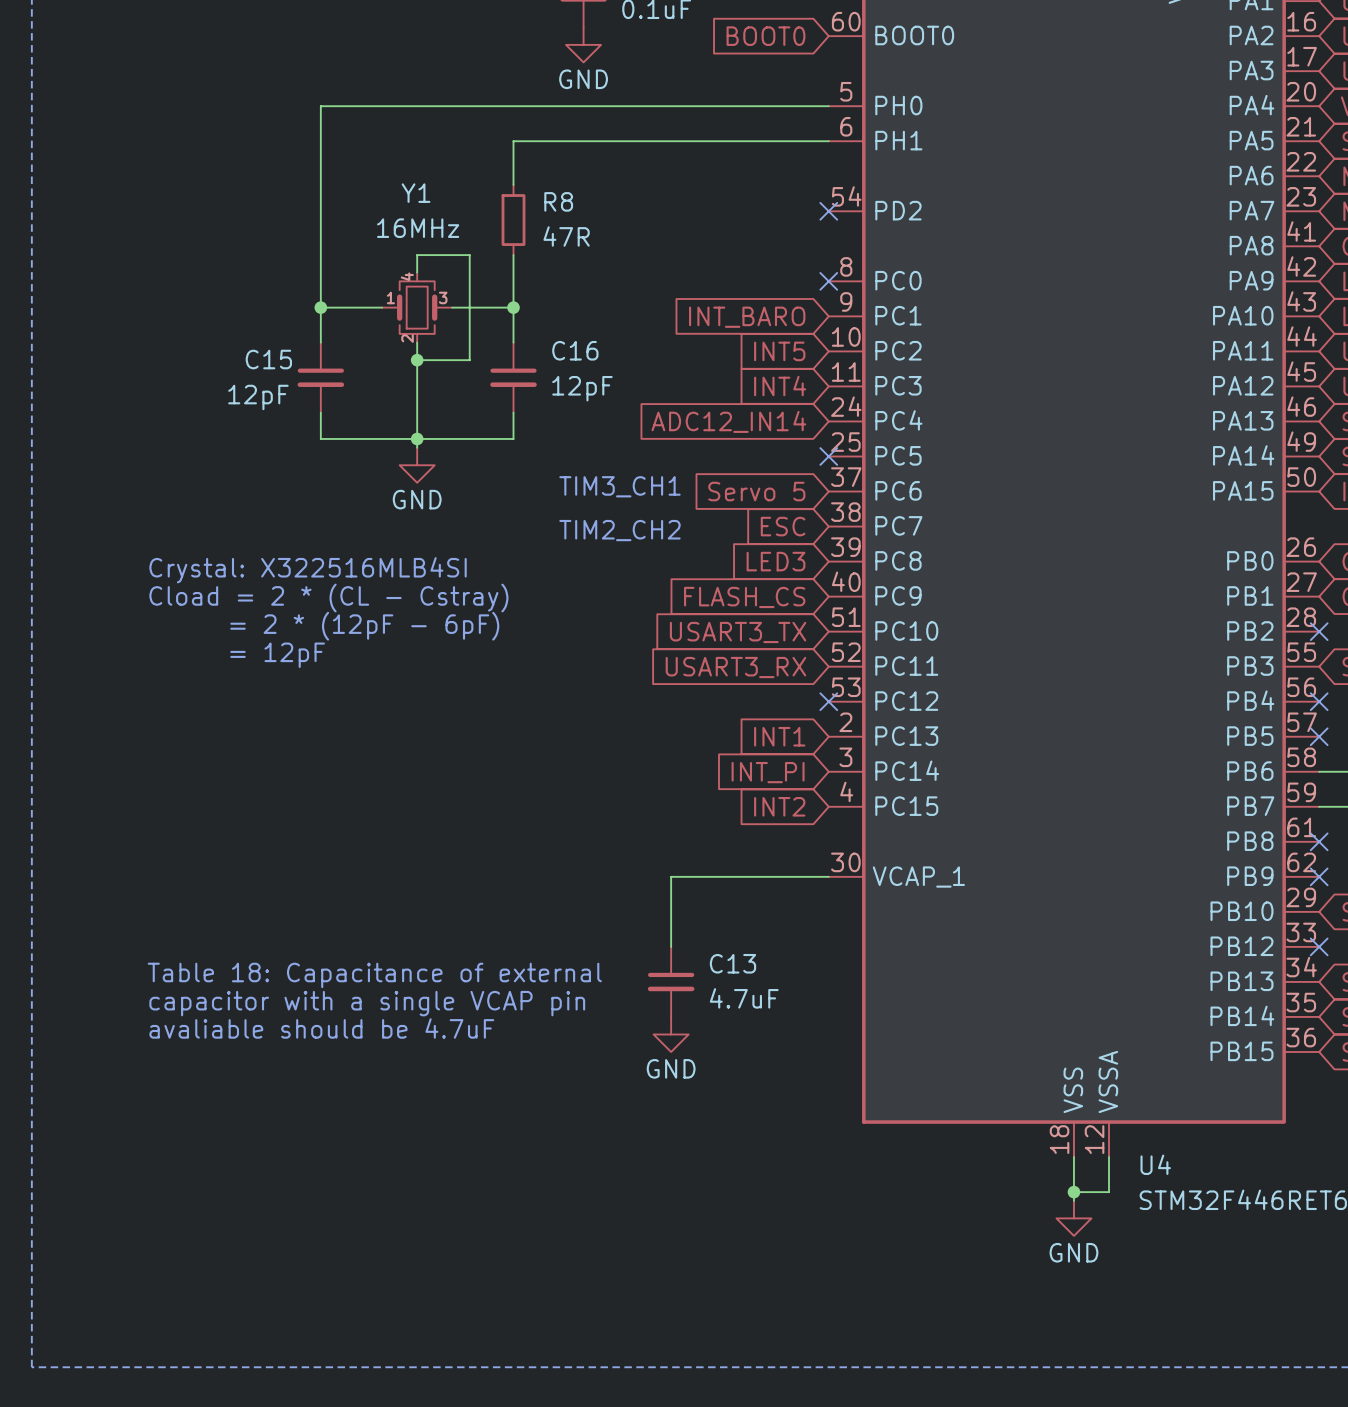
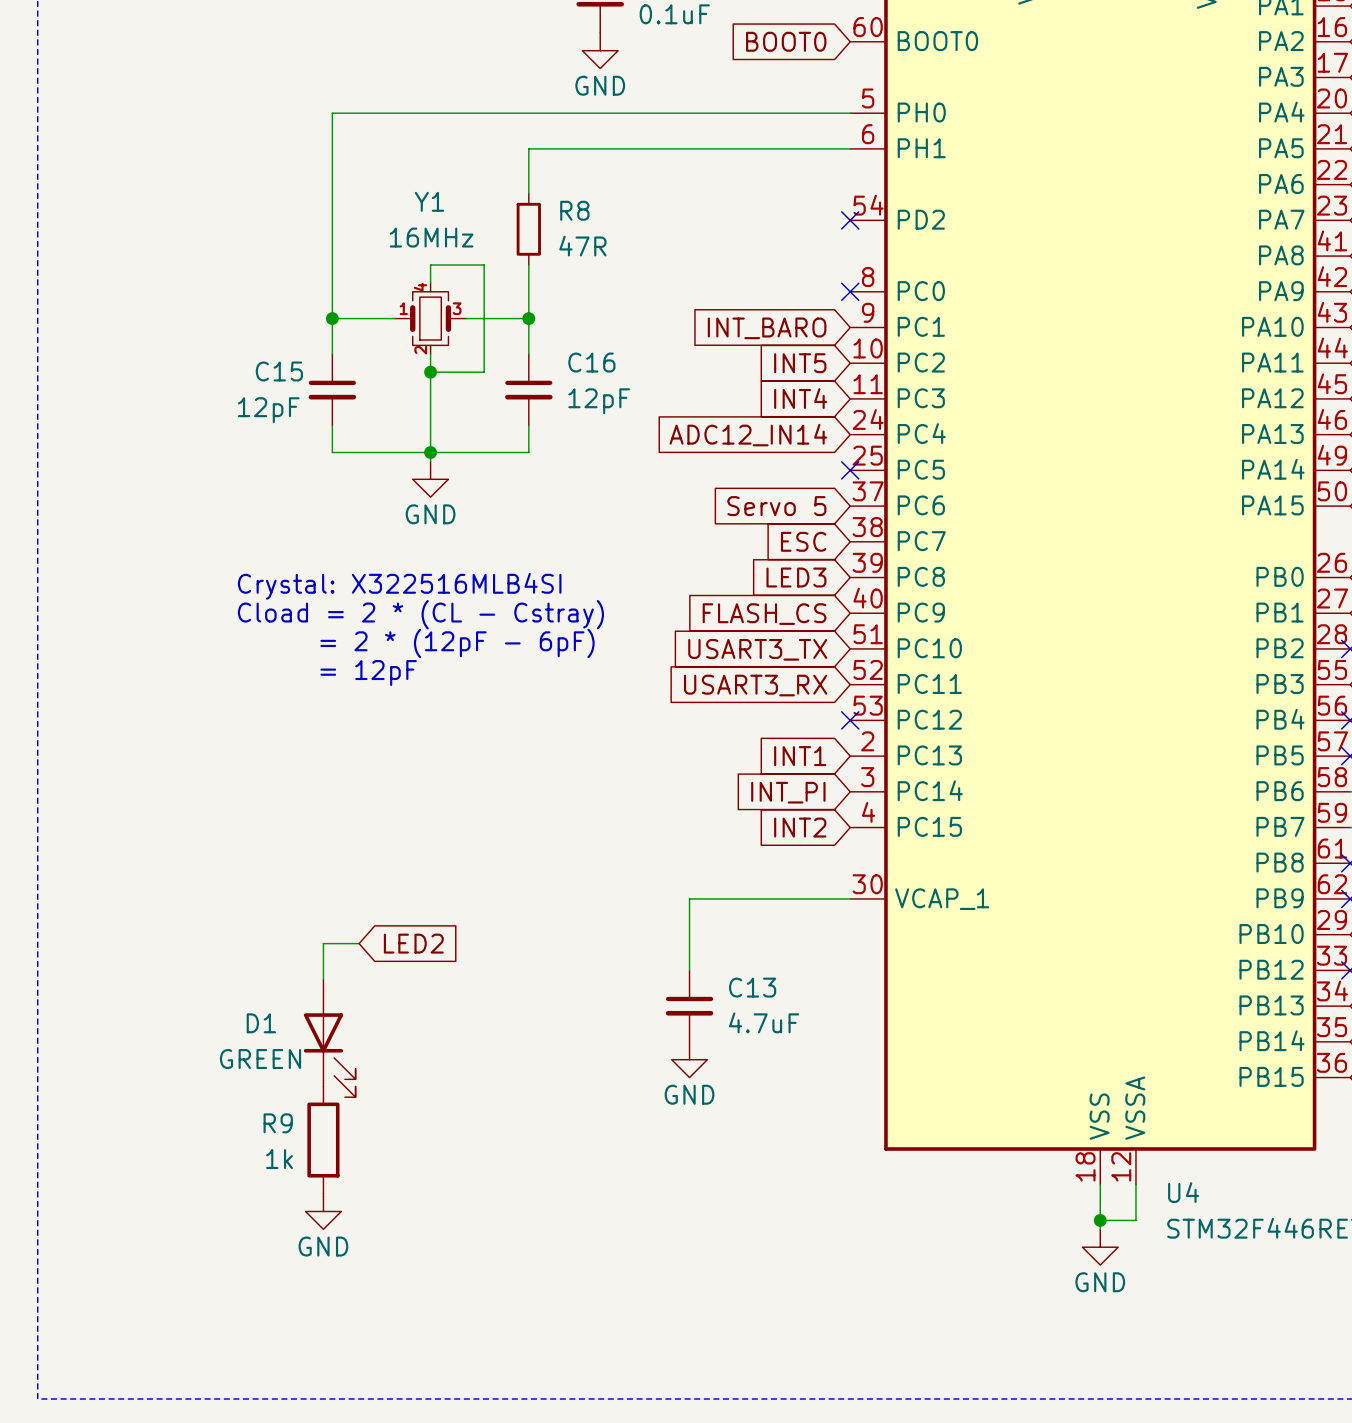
text: TIM3_CH1 (619, 486) -> none
text: TIM2_CH2 (619, 530) -> none
text position: Crystal: X322516MLB4SI (308, 570) -> Crystal: X322516MLB4SI (399, 586)
text position: Cload = 2 * (CL - Cstray) (328, 598) -> Cload = 2 * (CL - Cstray) (420, 614)
text position: = 2 * (12pF - 6pF) (364, 626) -> = 2 * (12pF - 6pF) (457, 643)
text position: = 12pF (277, 655) -> = 12pF (368, 673)
wire: none -> (359, 943) (323, 943) (323, 979)
global label: none -> LED2 (413, 943)
text: Table 18: Capacitance of external (374, 975) -> none
text: capacitor with a single VCAP pin (367, 1003) -> none
D1: none -> GREEN (329, 1038)
text: avaliable should be 4.7uF (321, 1028) -> none
R9: none -> 1k (323, 1140)
power symbol: none -> GND (323, 1211)

